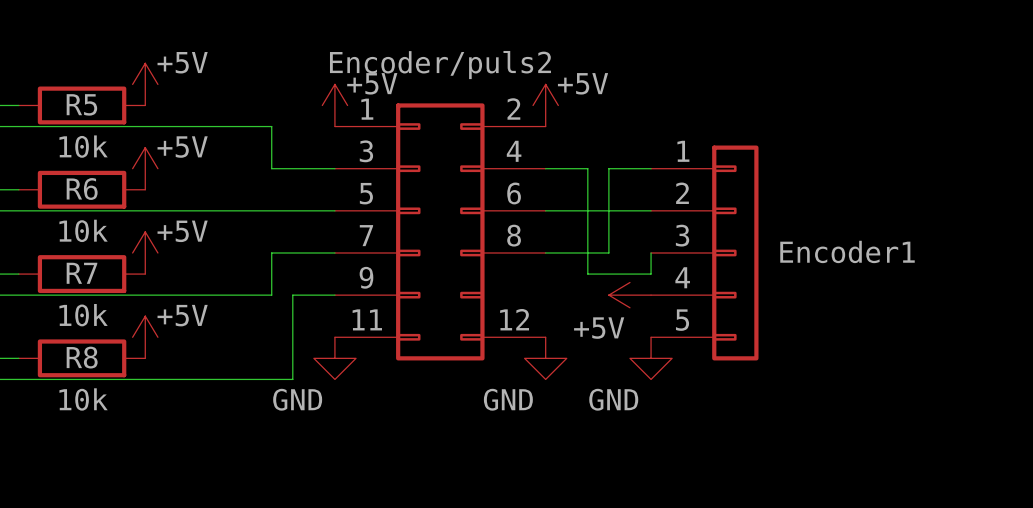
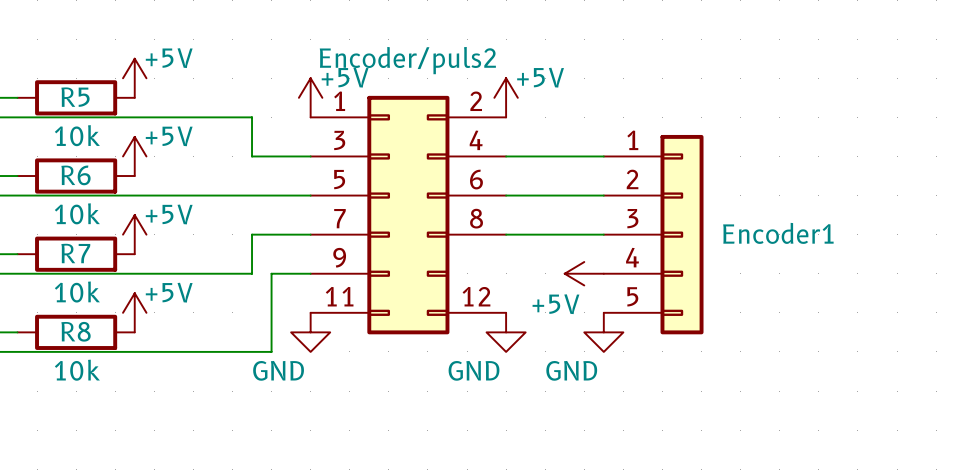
wire: (587, 168) (587, 274) (651, 274) (651, 252) -> (564, 234) (603, 234)
wire: (608, 168) (608, 252) -> (564, 156) (545, 156)

